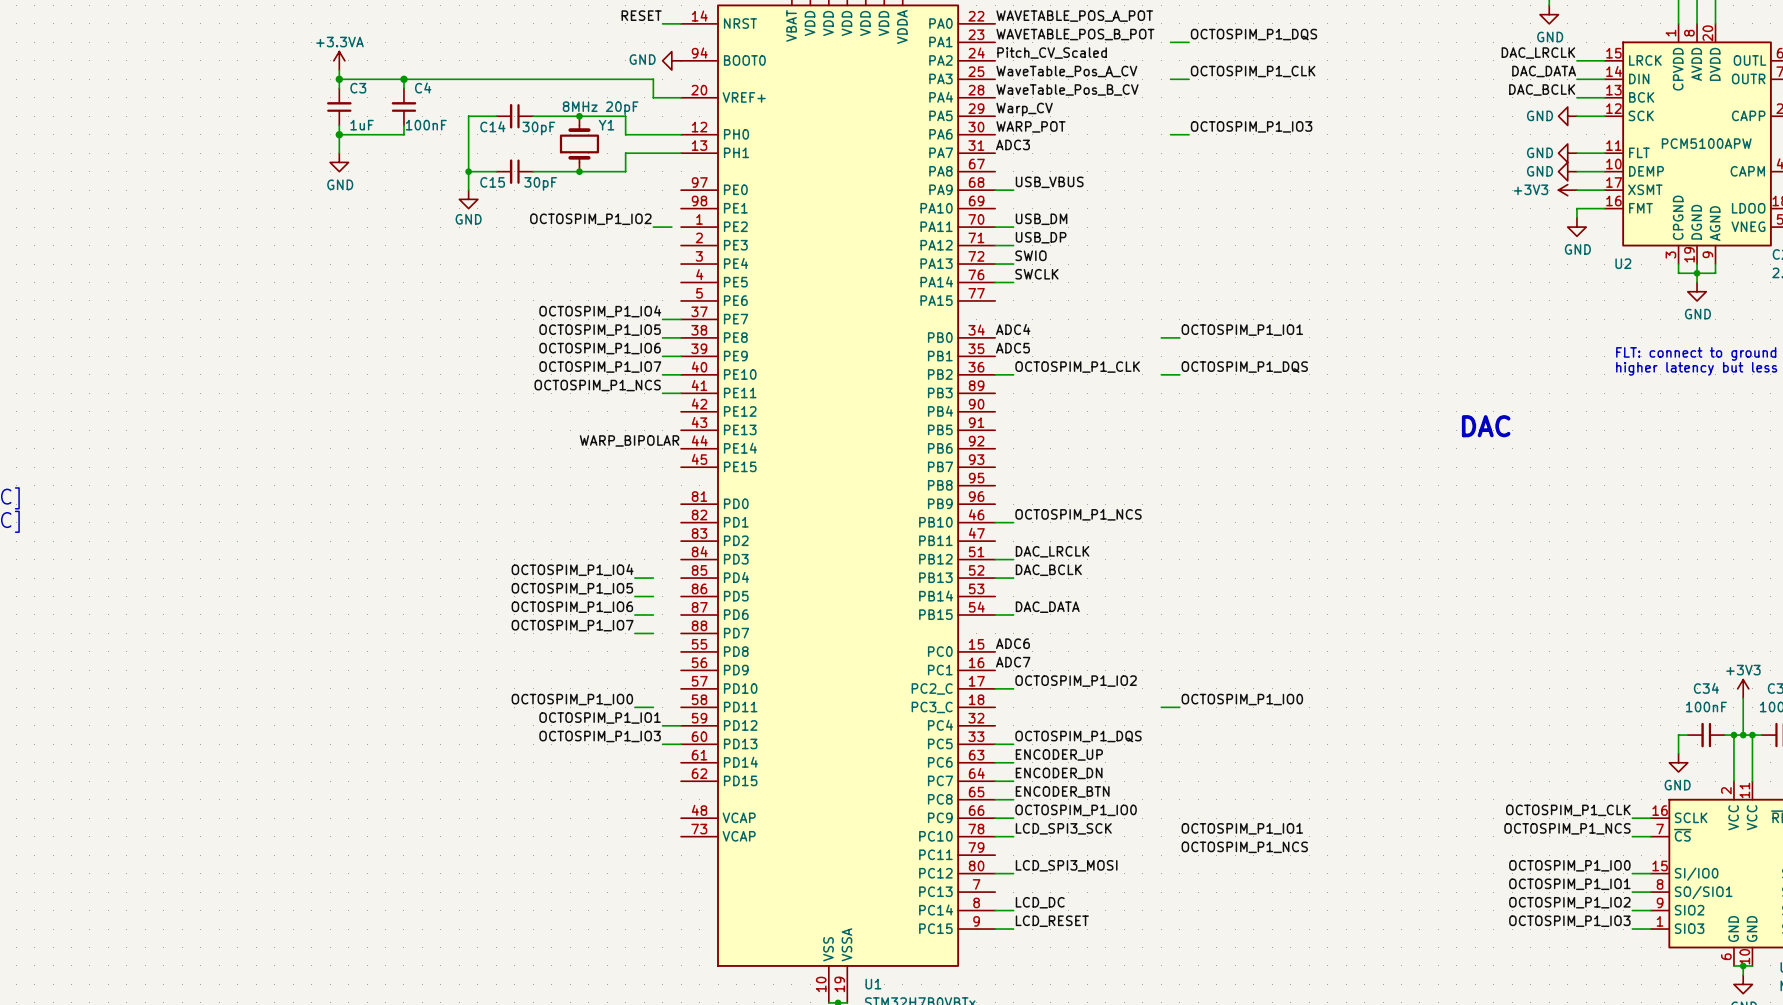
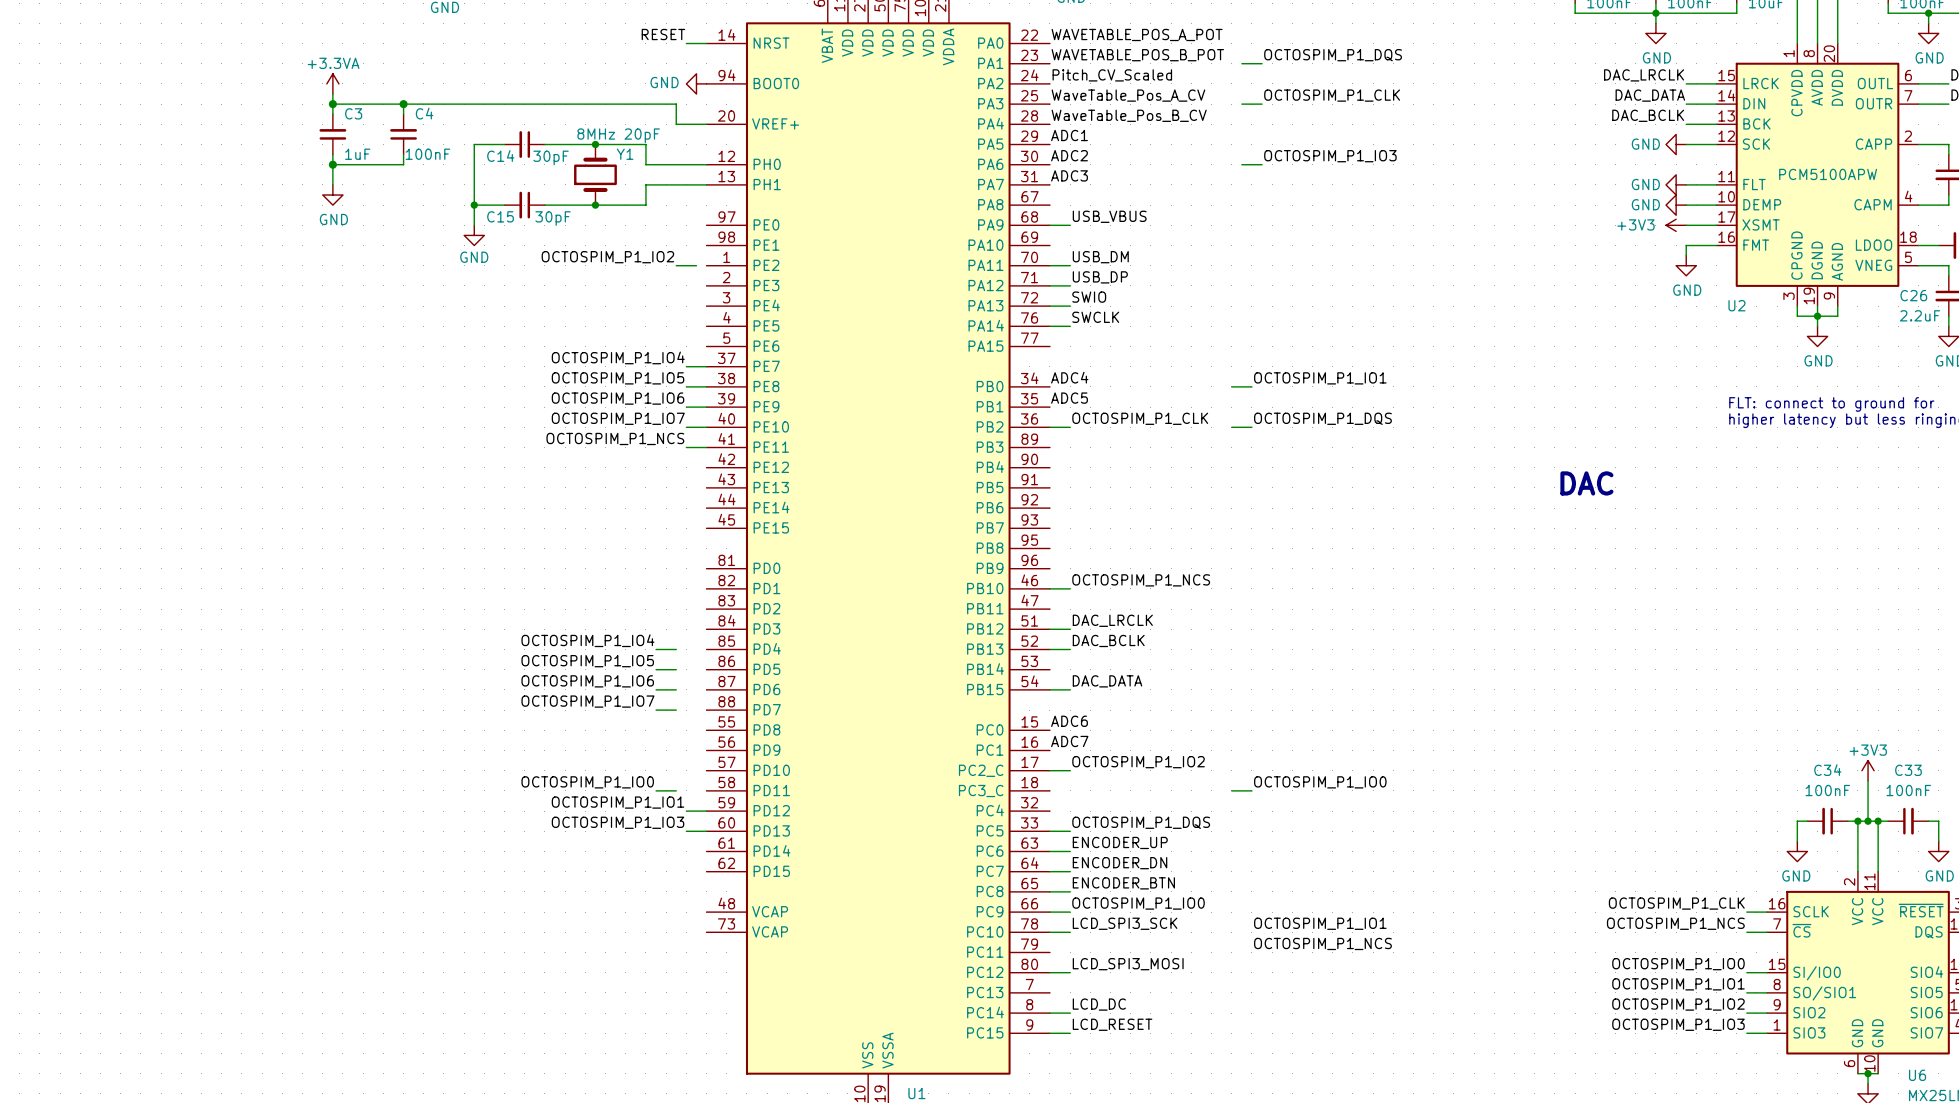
label: Warp_CV (1024, 109) -> ADC1 (1069, 135)
label: WARP_POT (1031, 126) -> ADC2 (1069, 155)
label: WARP_BIPOLAR (629, 440) -> none

